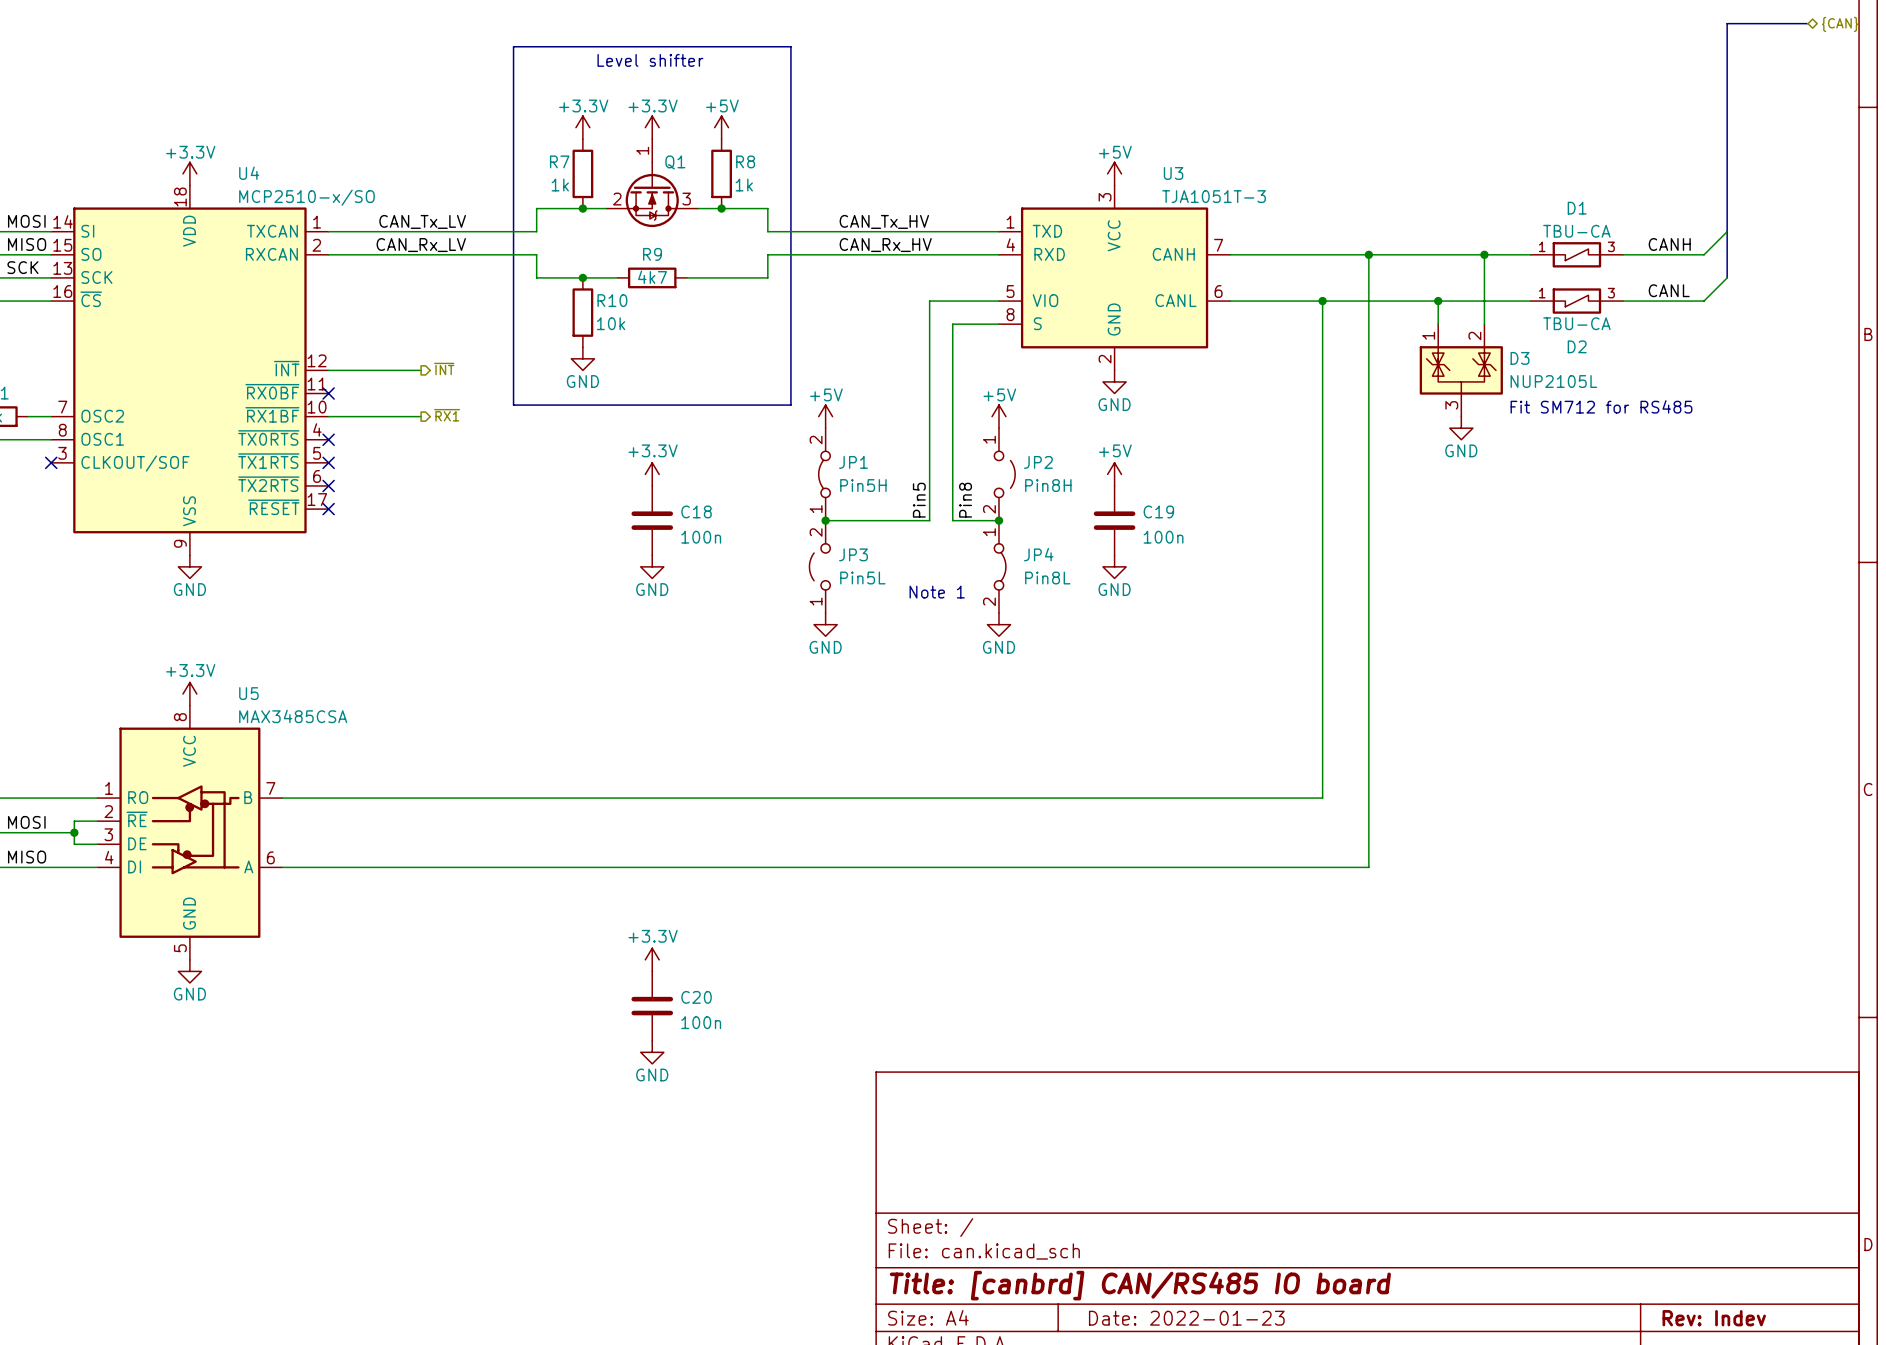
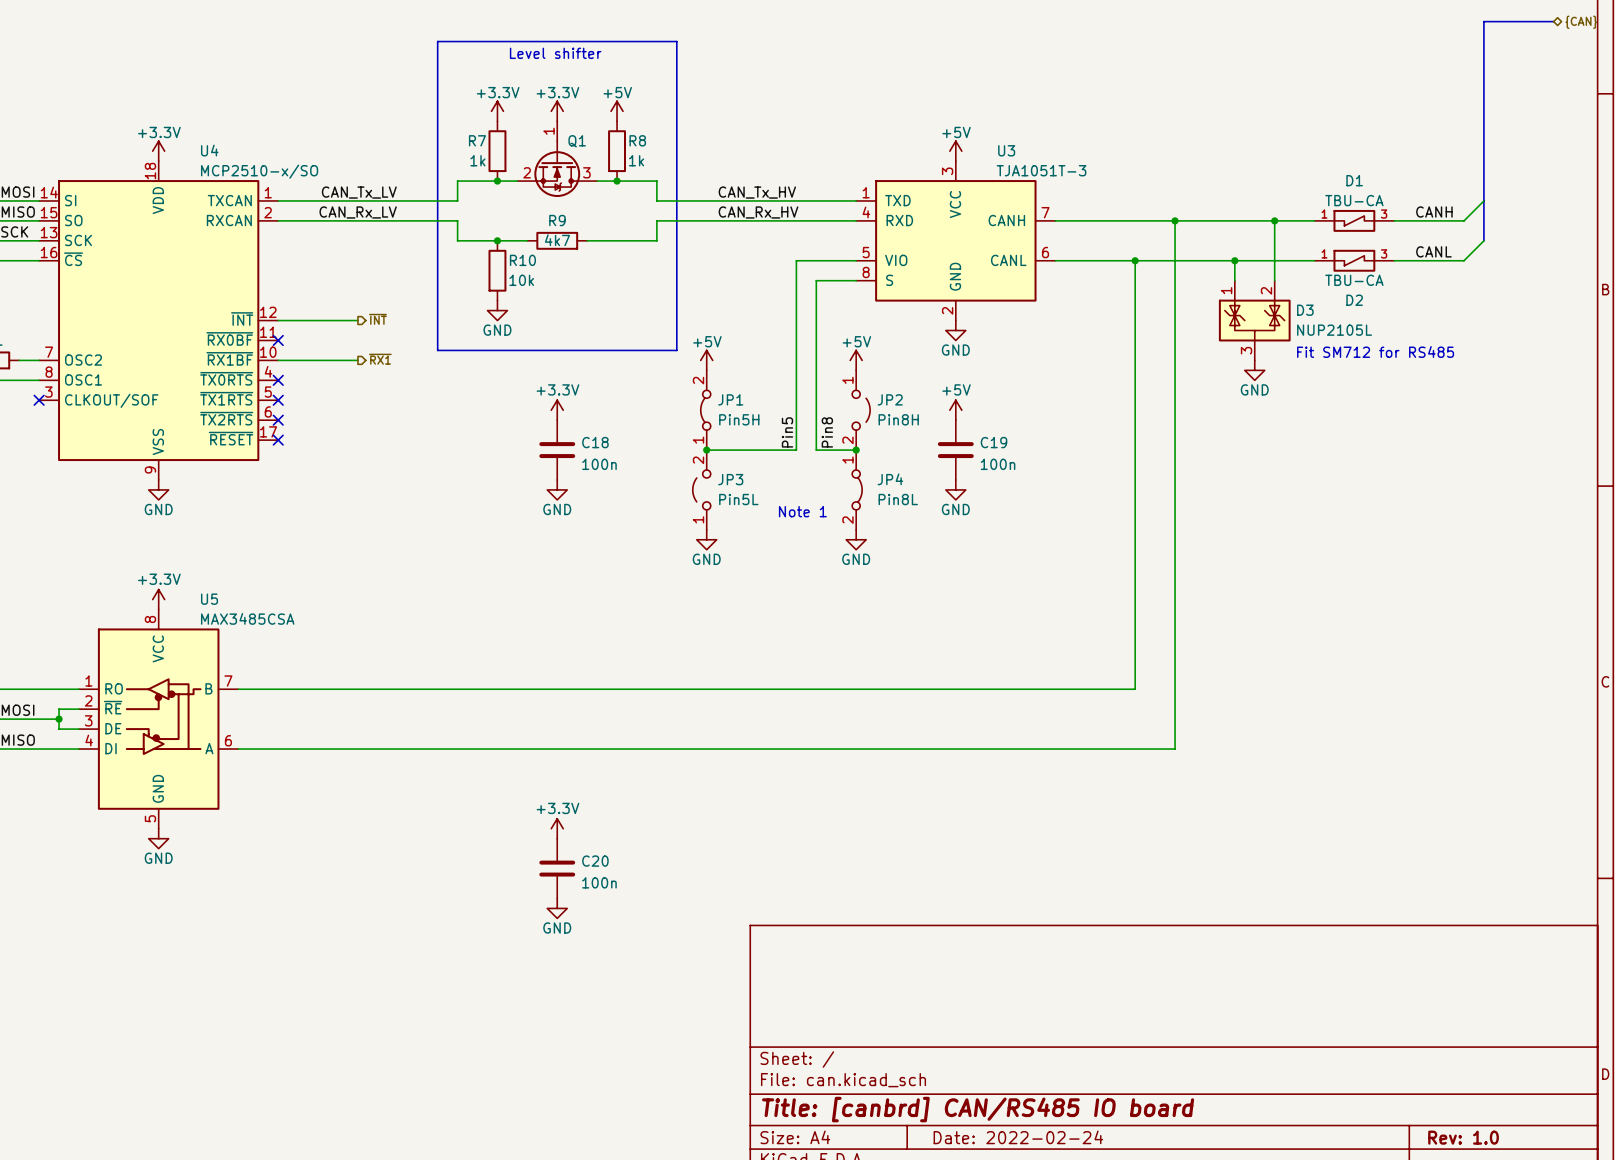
title block: Date: 2022-01-23 (1186, 1318) -> Date: 2022-02-24 (1018, 1137)
title block: Rev: Indev (1714, 1318) -> Rev: 1.0 (1463, 1137)

